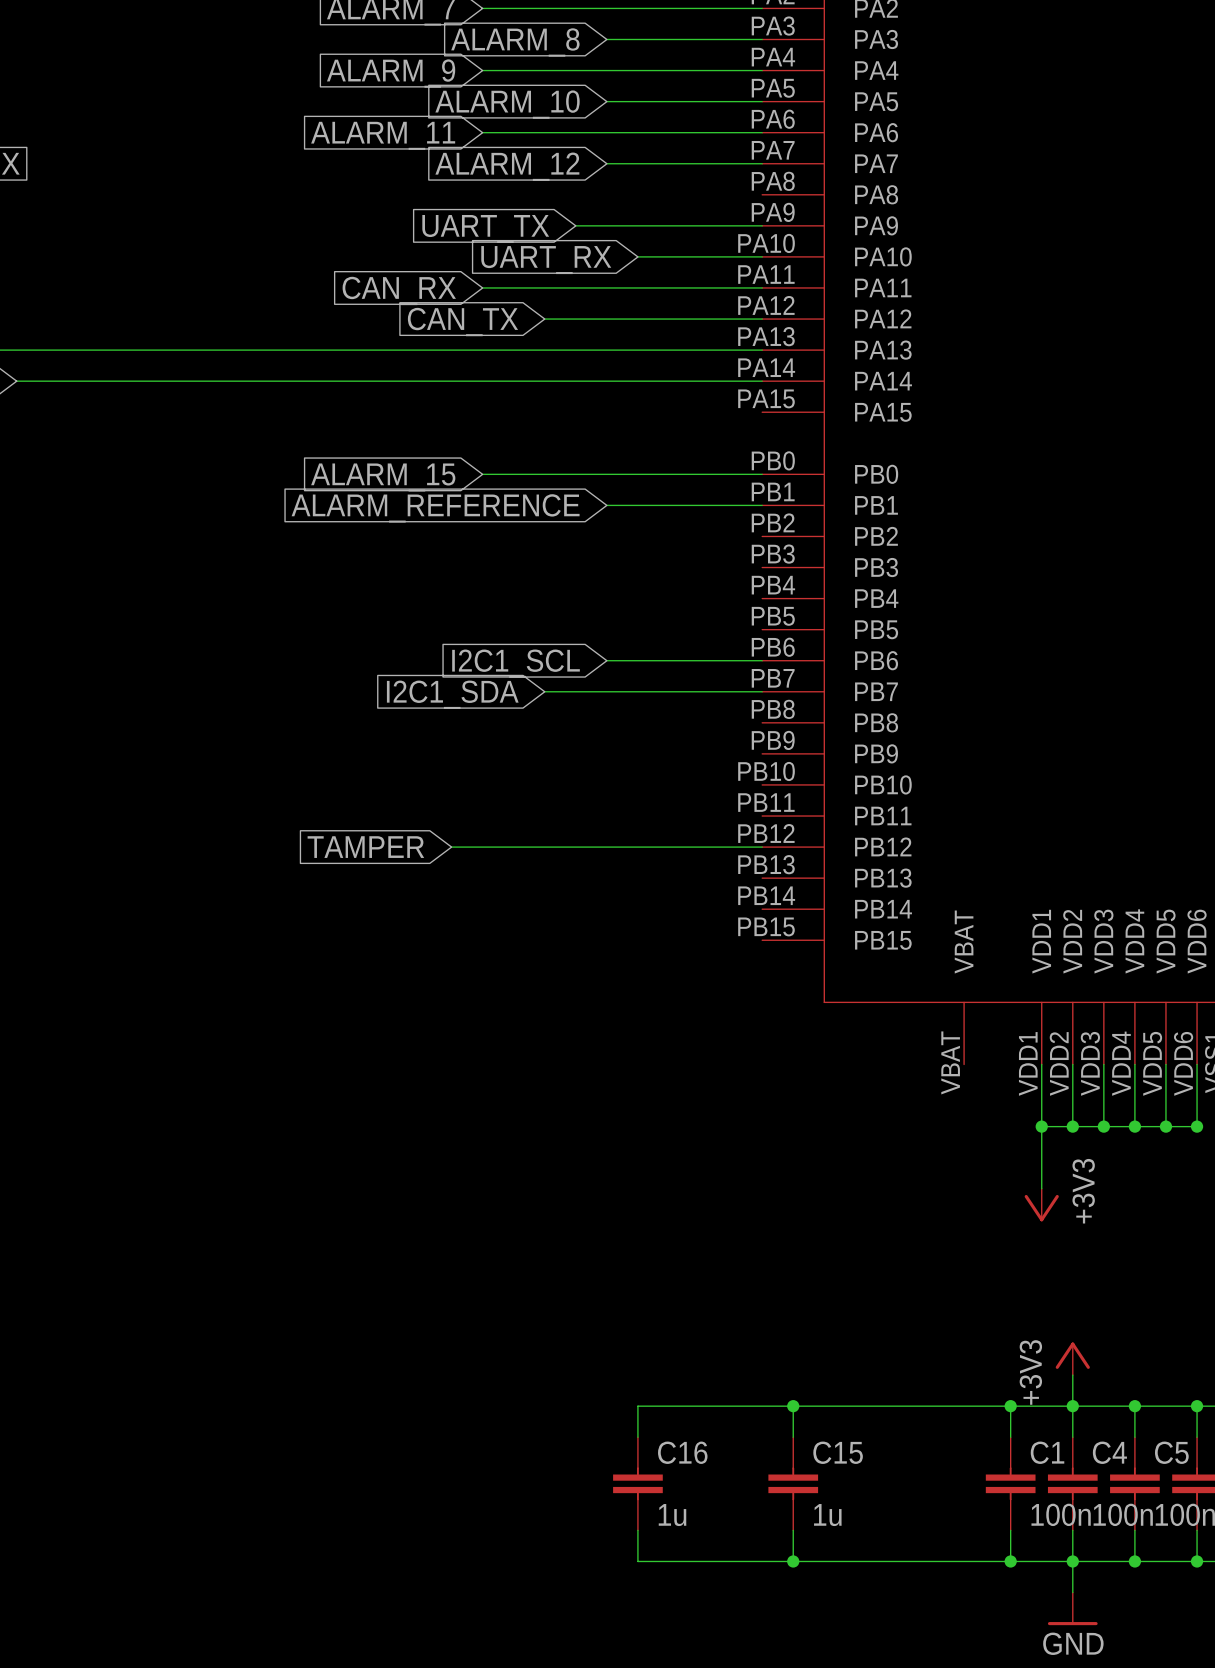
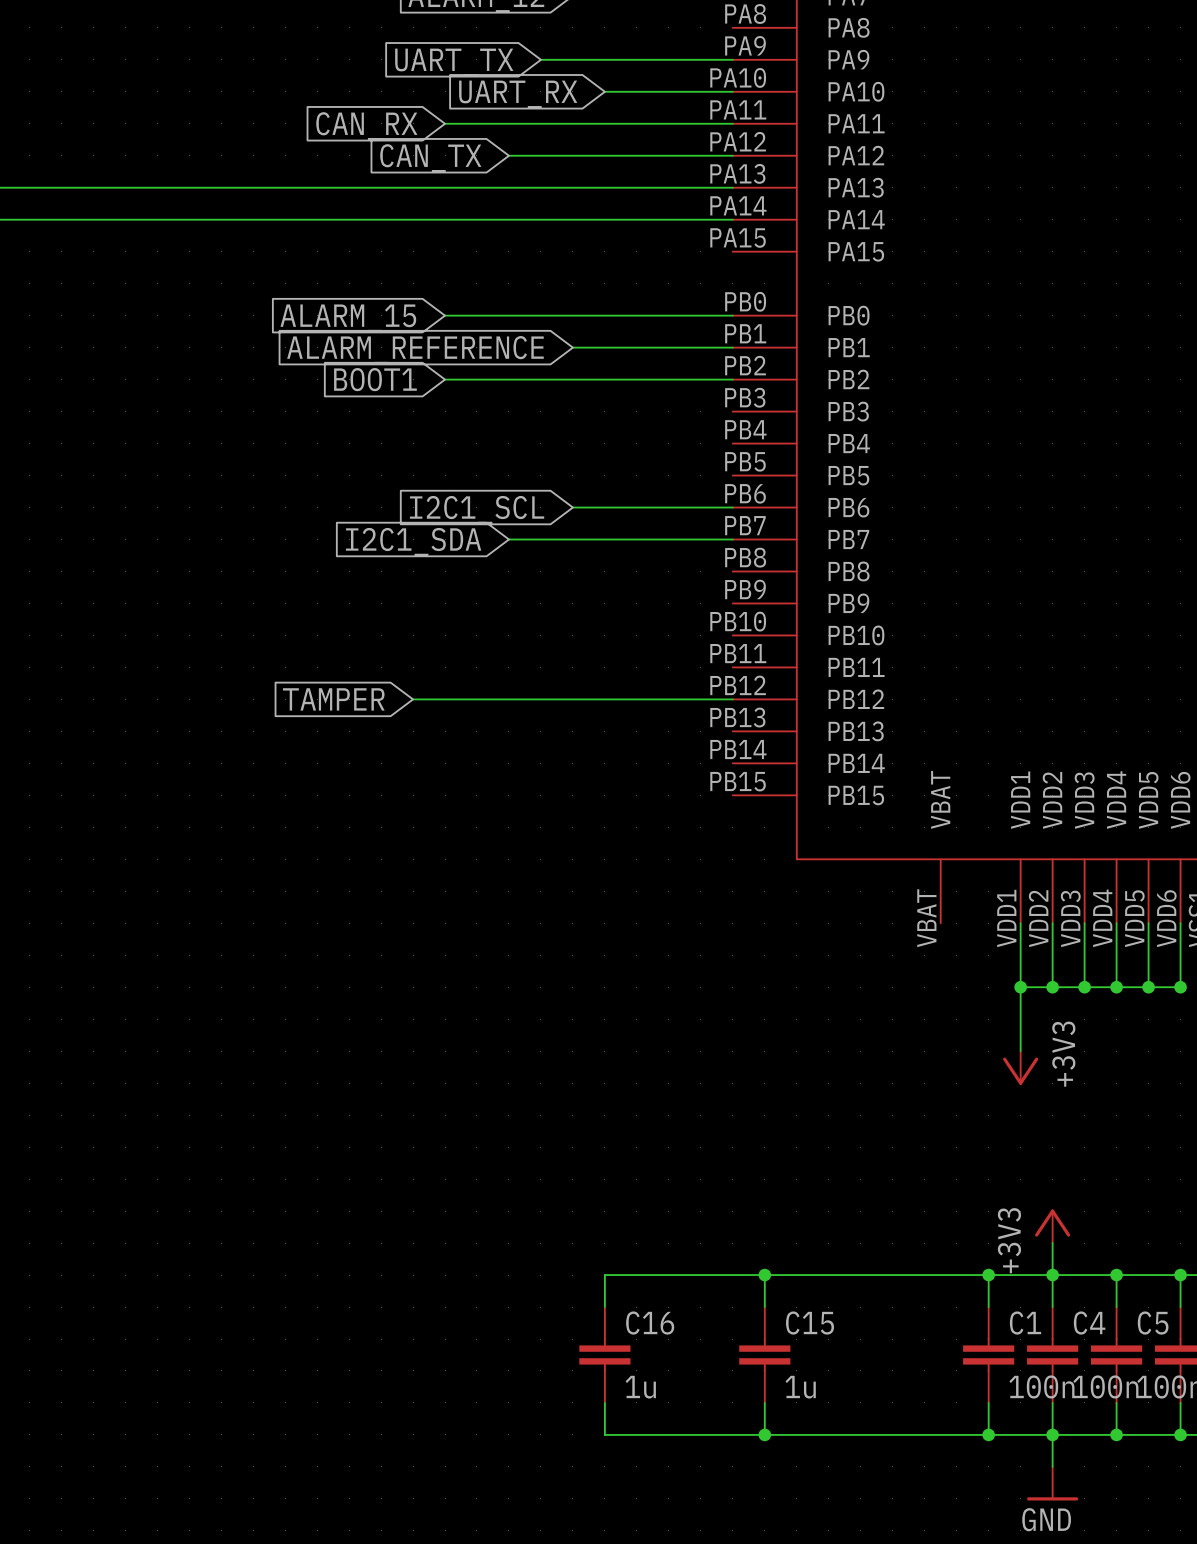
global label: none -> BOOT1 (375, 379)
wire: none -> (445, 379) (732, 379)

